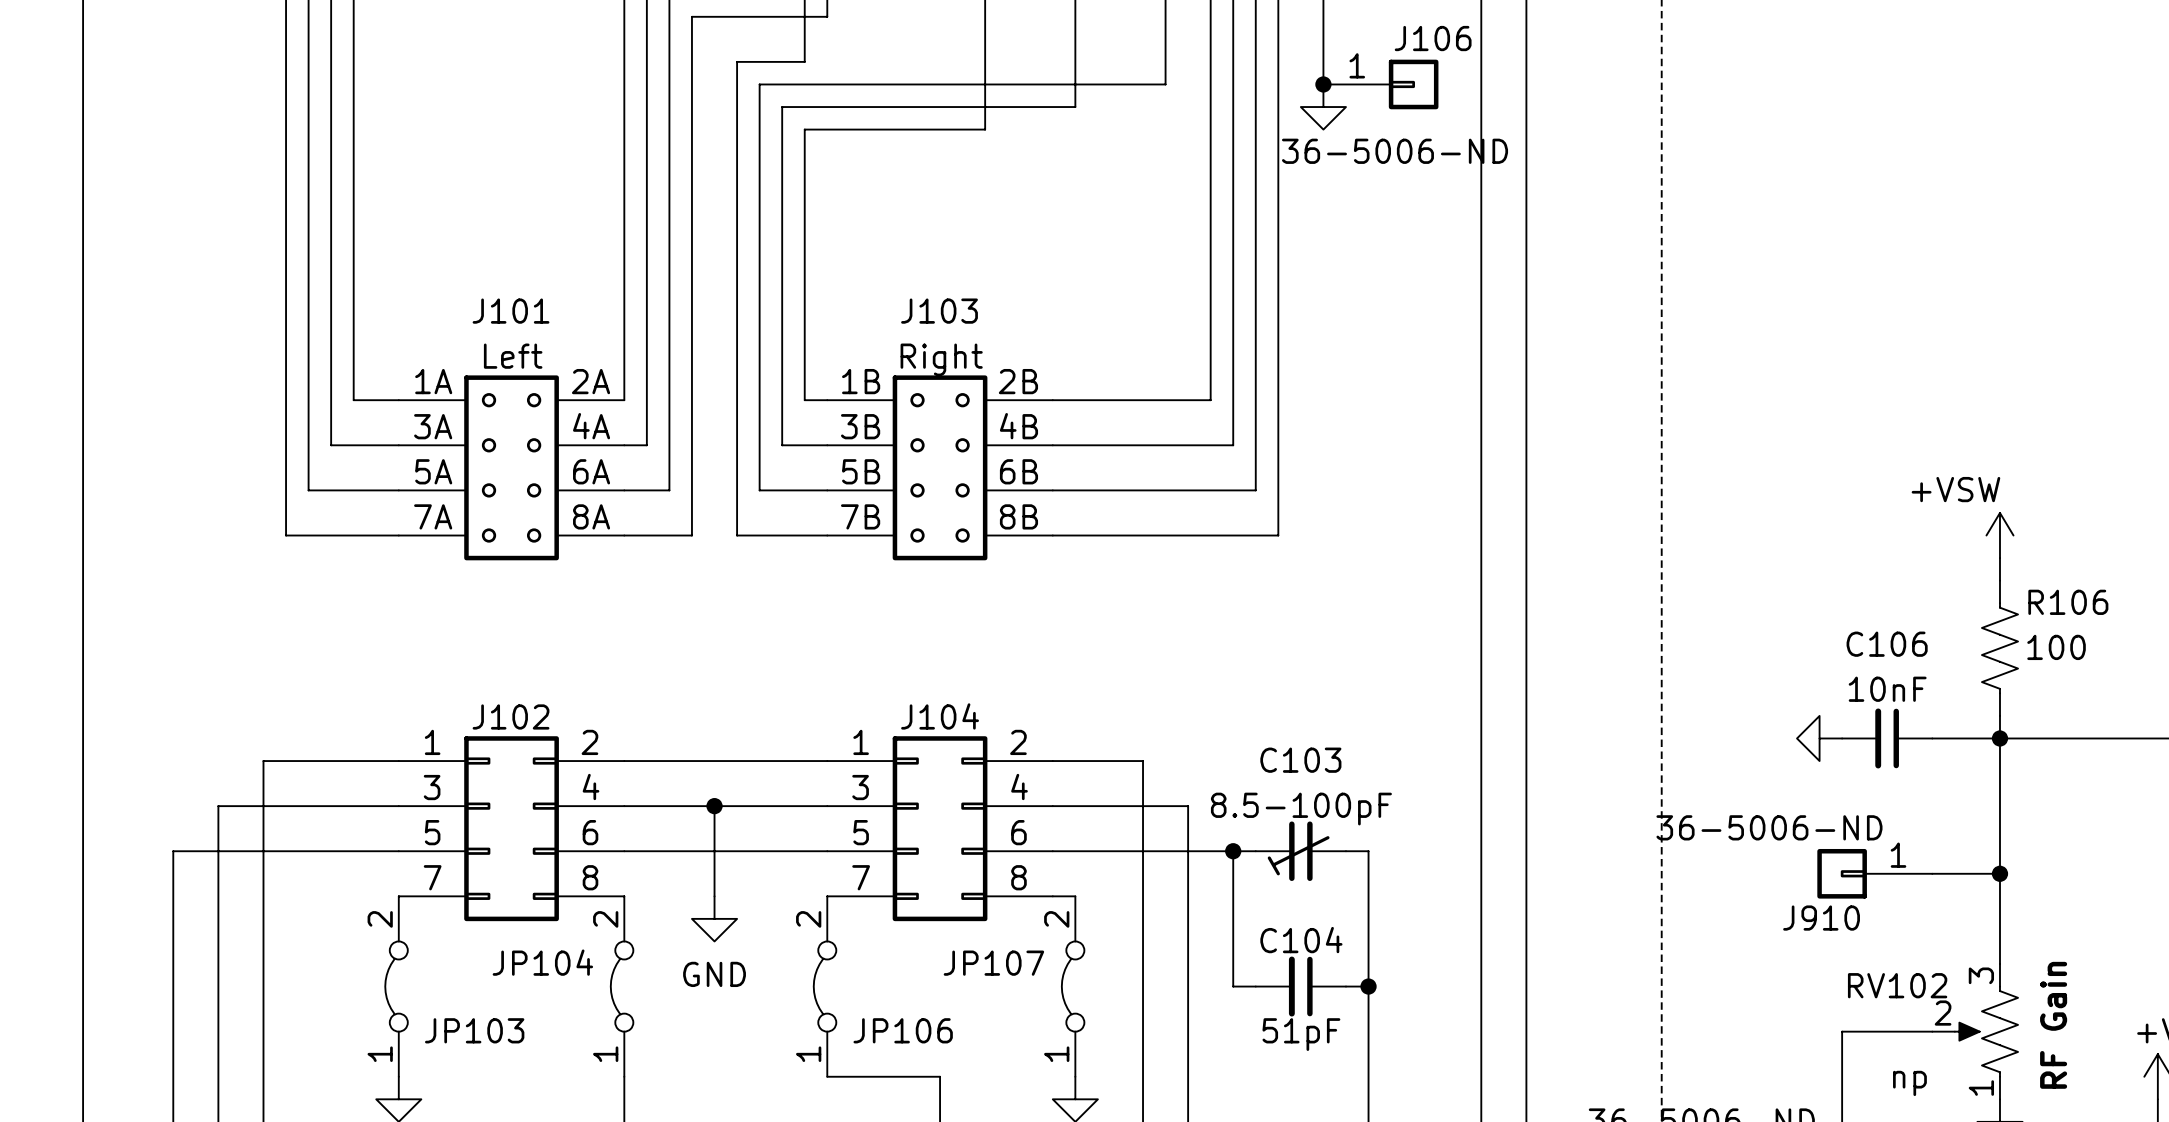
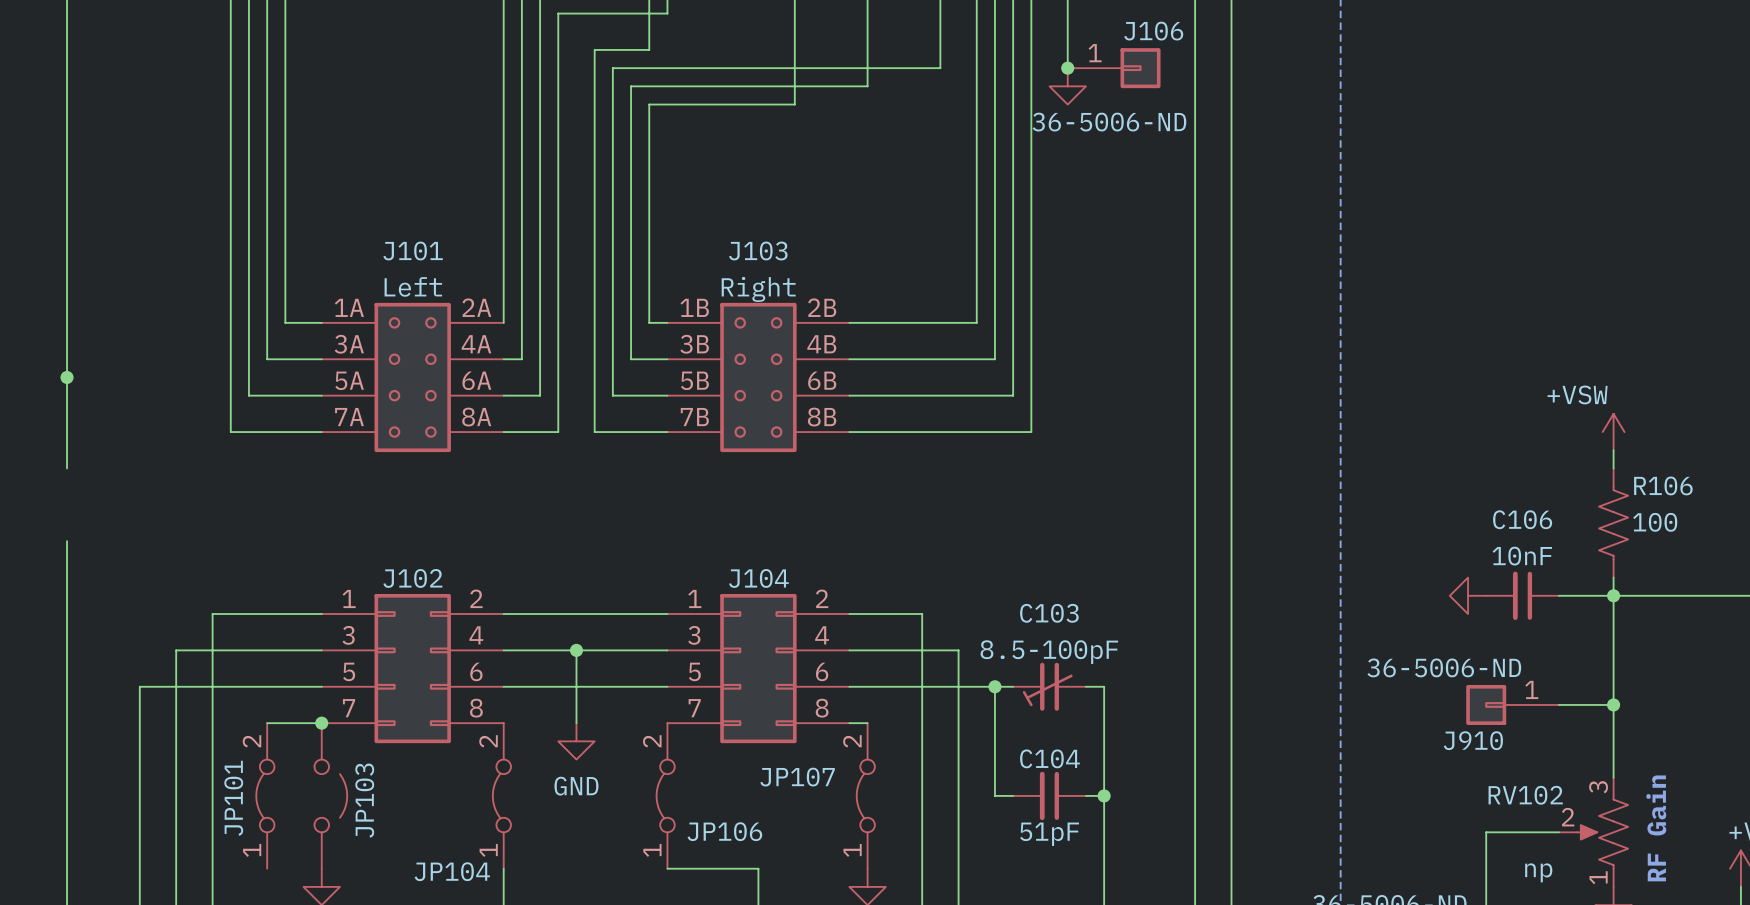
junction: none -> (67, 377)
wire: (83, 580) (83, 670) -> none
wire: none -> (267, 723) (321, 723)
JP103 symbol: [385, 896, 408, 1077] -> [314, 723, 348, 869]
junction: none -> (321, 723)
JP104 name position: JP104 (542, 962) -> JP104 (452, 871)
JP101: none -> (265, 795)
JP103 name position: JP103 (474, 1030) -> JP103 (364, 800)

